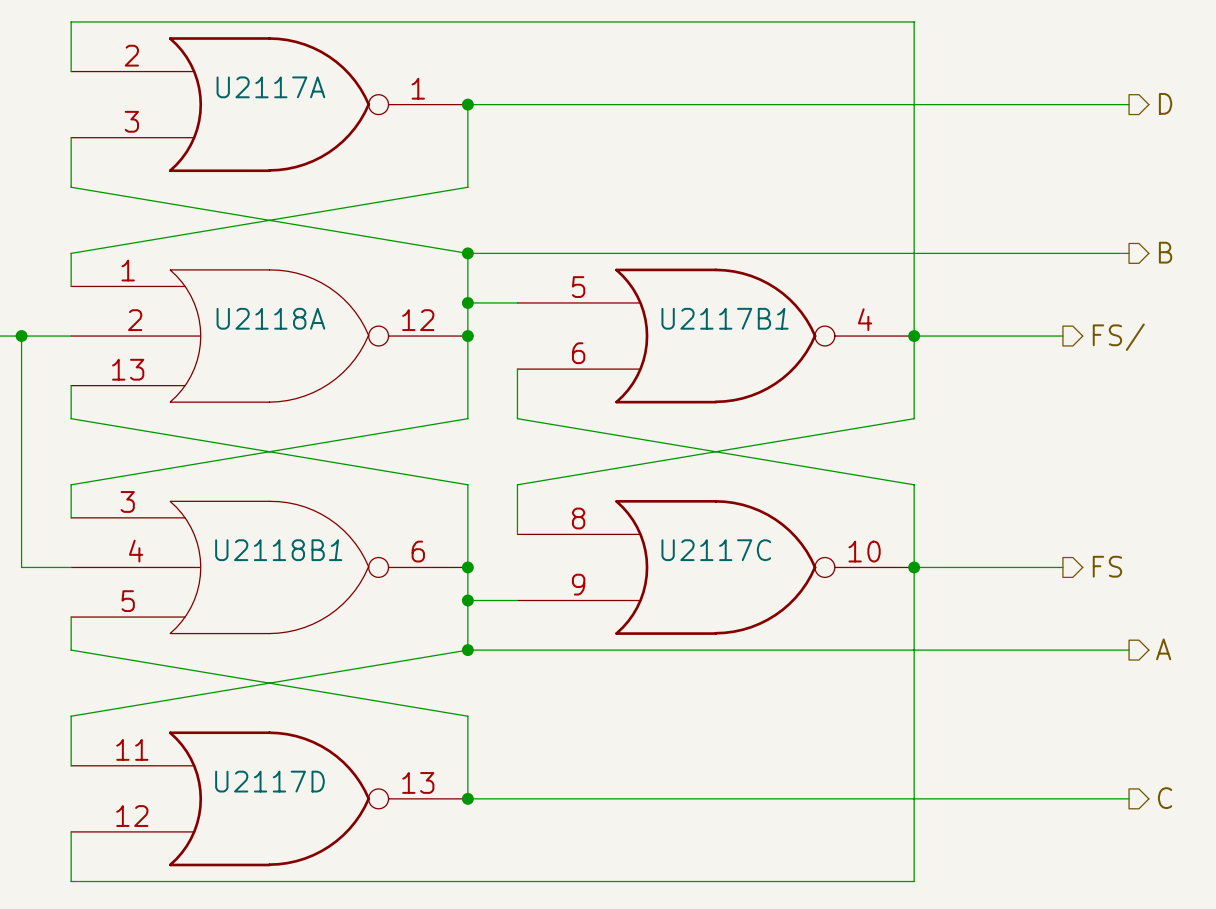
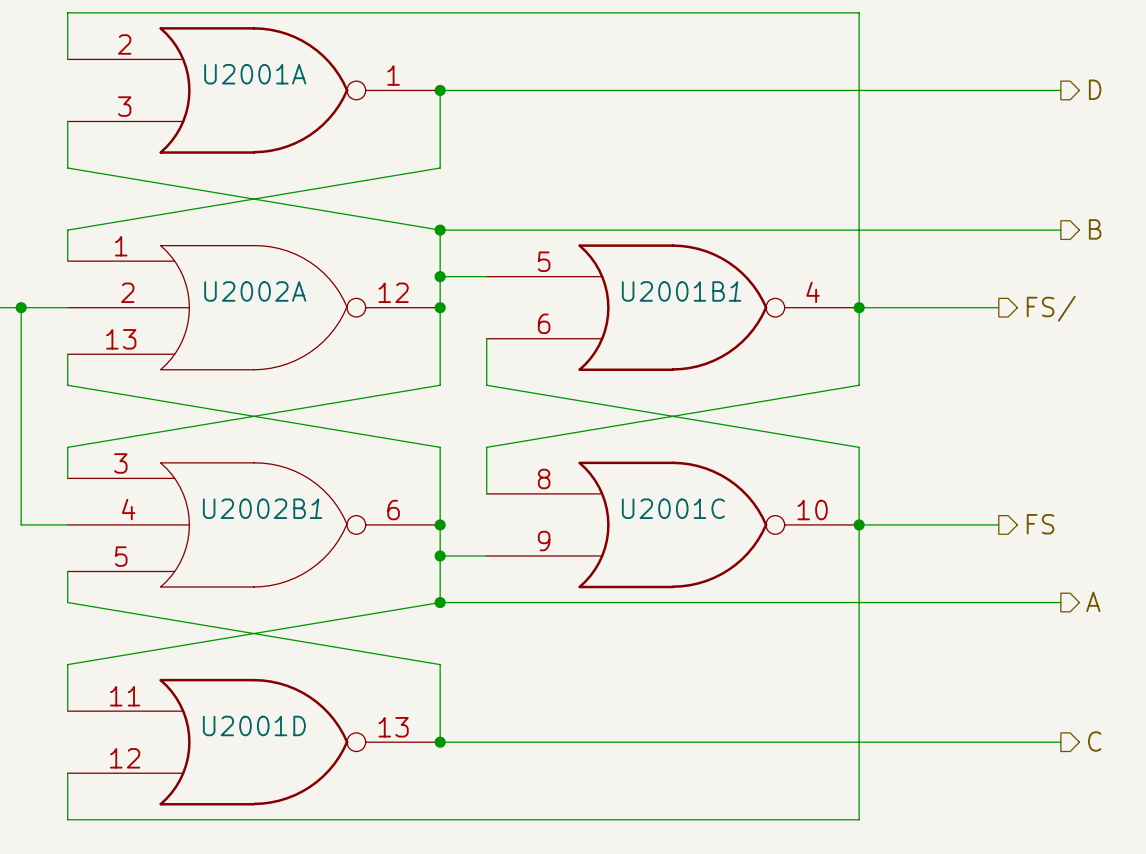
U2117A name: U2117A (270, 87) -> U2001A (255, 74)
U2118A name: U2118A (270, 318) -> U2002A (255, 291)
U2117B name: U2117B (716, 318) -> U2001B (673, 291)
U2118B name: U2118B (269, 550) -> U2002B (254, 508)
U2117C name: U2117C (716, 550) -> U2001C (673, 508)
U2117D name: U2117D (269, 781) -> U2001D (254, 725)

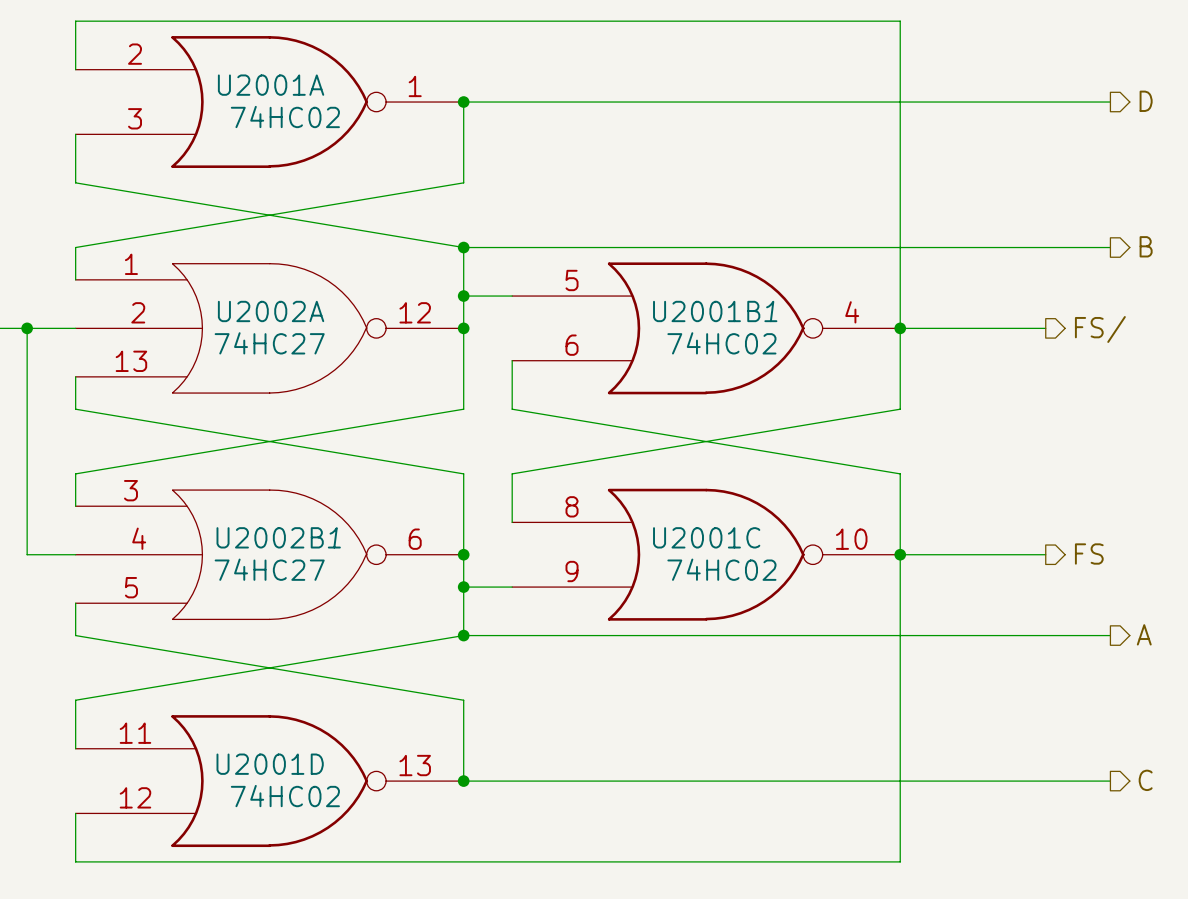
U2001A value: none -> 74HC02 (285, 116)
U2002A value: none -> 74HC27 (269, 343)
U2001B value: none -> 74HC02 (721, 343)
U2002B value: none -> 74HC27 (269, 569)
U2001C value: none -> 74HC02 (721, 569)
U2001D value: none -> 74HC02 (285, 796)

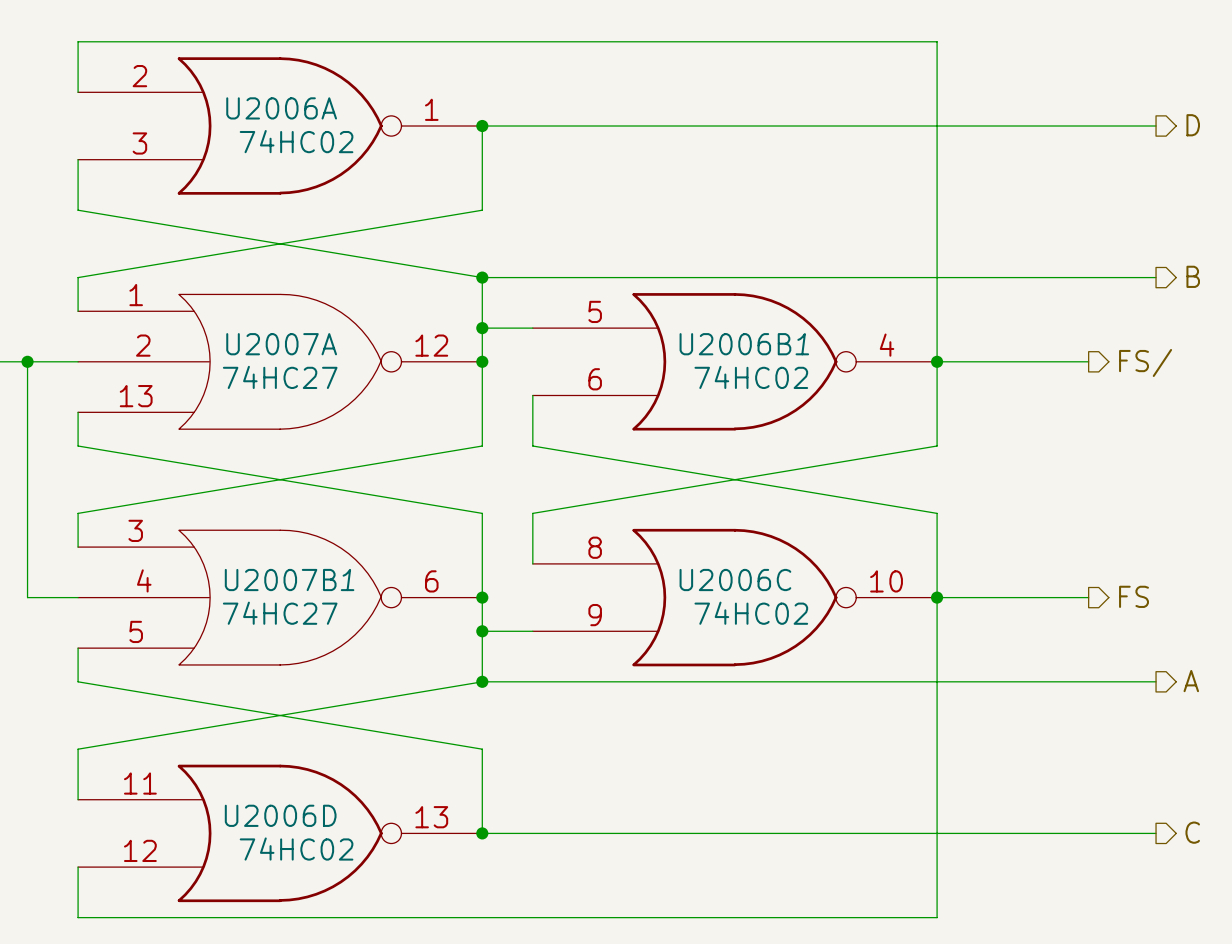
U2001A name: U2001A (271, 85) -> U2006A (281, 108)
U2002A name: U2002A (271, 311) -> U2007A (281, 344)
U2001B name: U2001B (706, 311) -> U2006B (735, 344)
U2002B name: U2002B (270, 537) -> U2007B (280, 580)
U2001C name: U2001C (706, 537) -> U2006C (735, 580)
U2001D name: U2001D (270, 764) -> U2006D (280, 815)

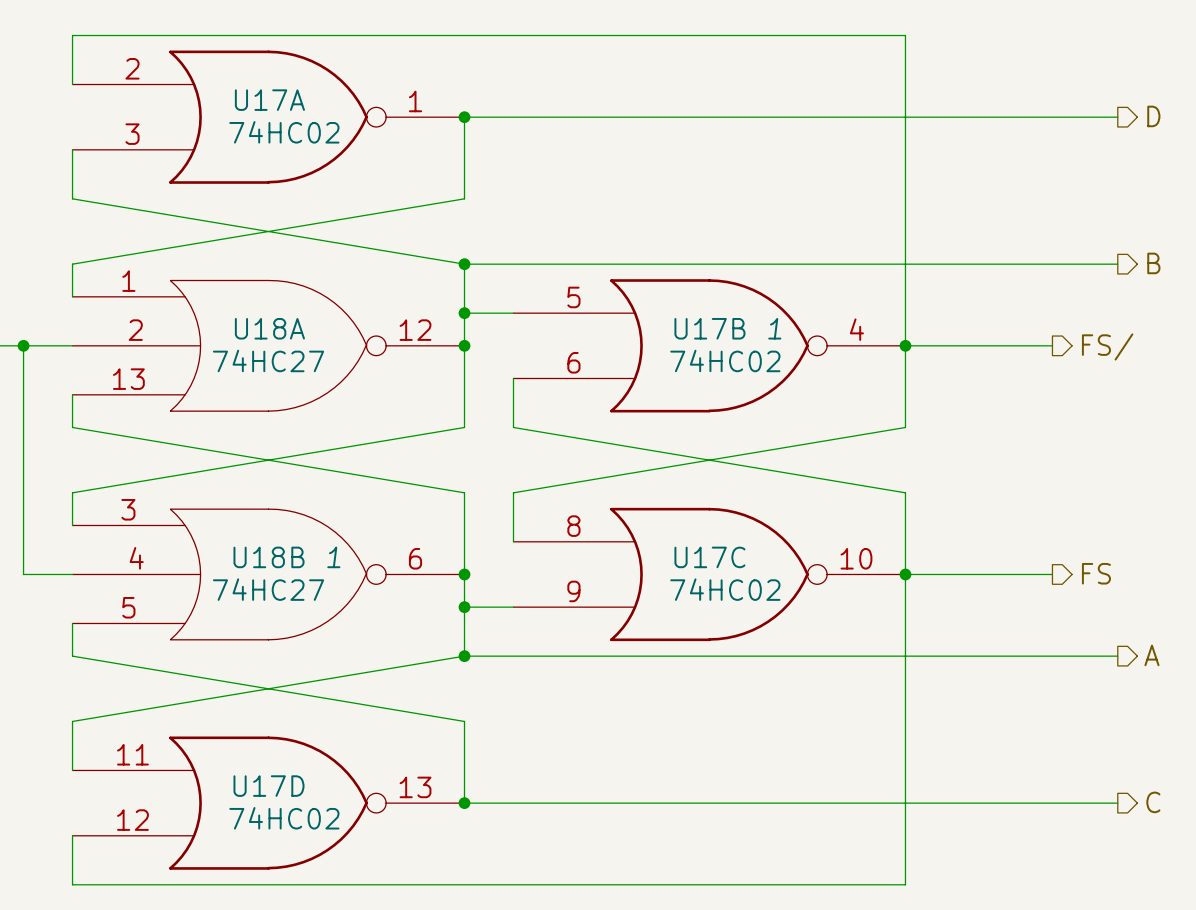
U2006A name: U2006A (281, 108) -> U17A (269, 100)
U2007A name: U2007A (281, 344) -> U18A (269, 328)
U2006B name: U2006B (735, 344) -> U17B (709, 328)
U2007B name: U2007B (280, 580) -> U18B (268, 557)
U2006C name: U2006C (735, 580) -> U17C (709, 557)
U2006D name: U2006D (280, 815) -> U17D (268, 786)

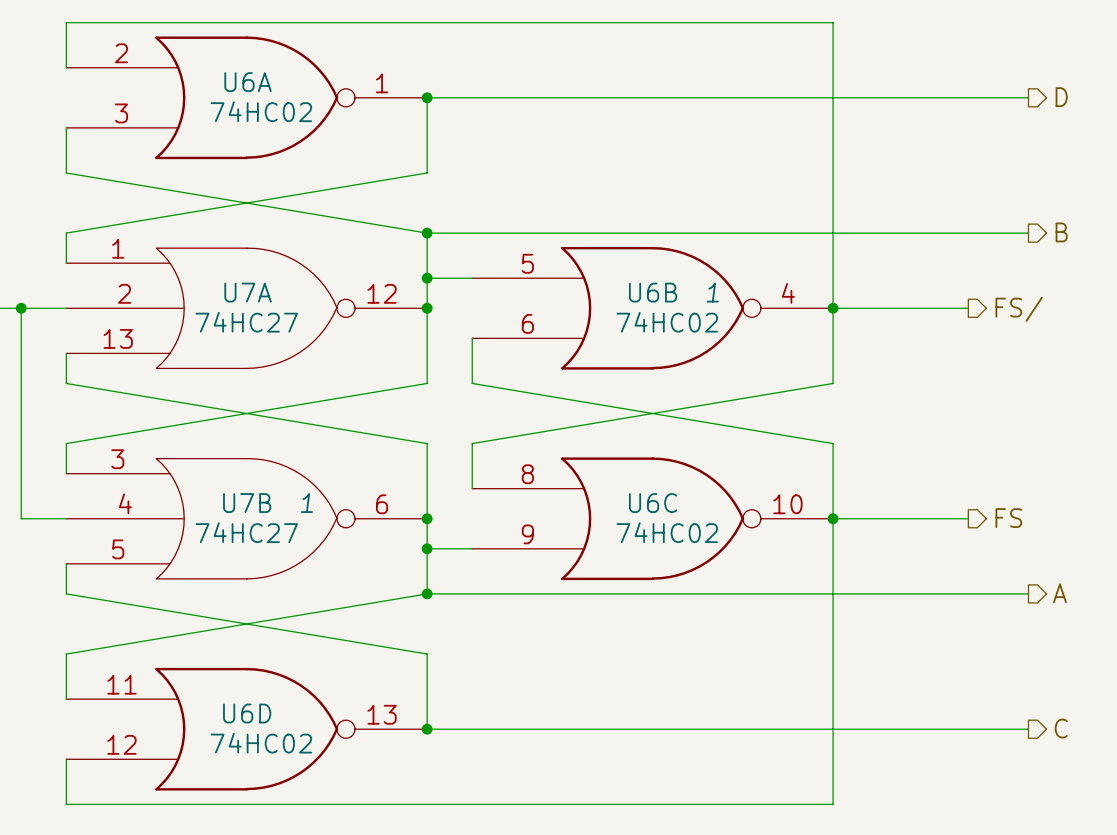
U17A name: U17A (269, 100) -> U6A (248, 82)
U18A name: U18A (269, 328) -> U7A (248, 292)
U17B name: U17B (709, 328) -> U6B (653, 292)
U18B name: U18B (268, 557) -> U7B (247, 503)
U17C name: U17C (709, 557) -> U6C (653, 503)
U17D name: U17D (268, 786) -> U6D (247, 713)

